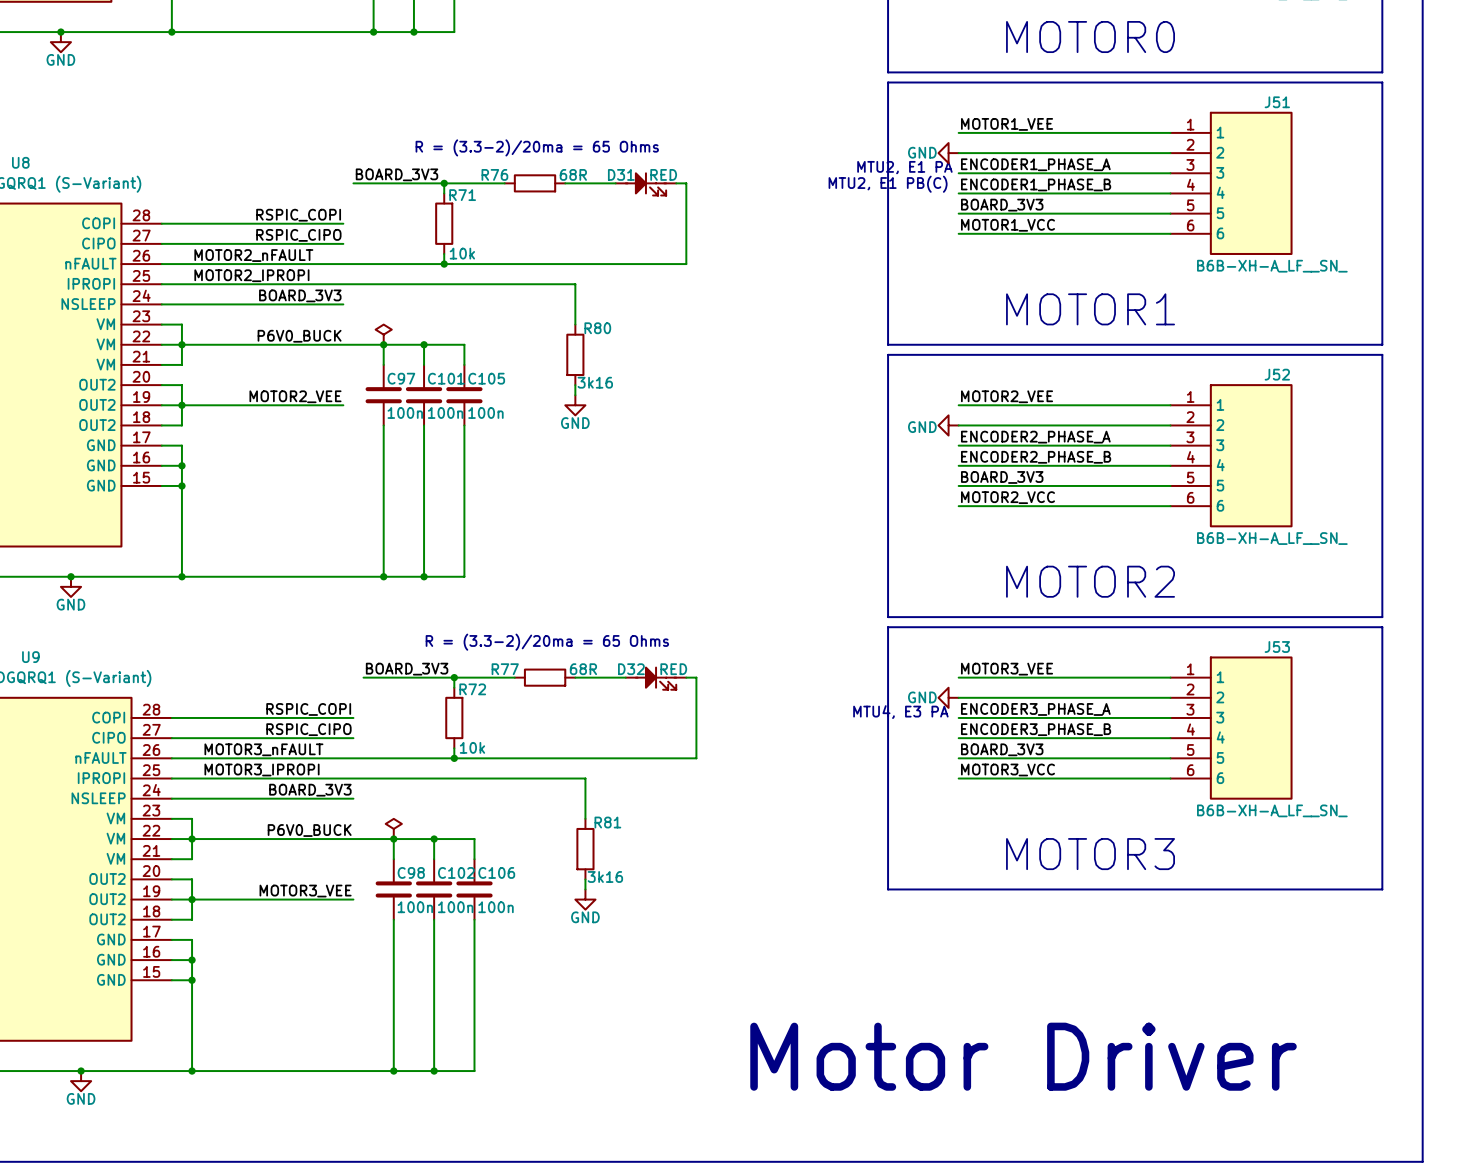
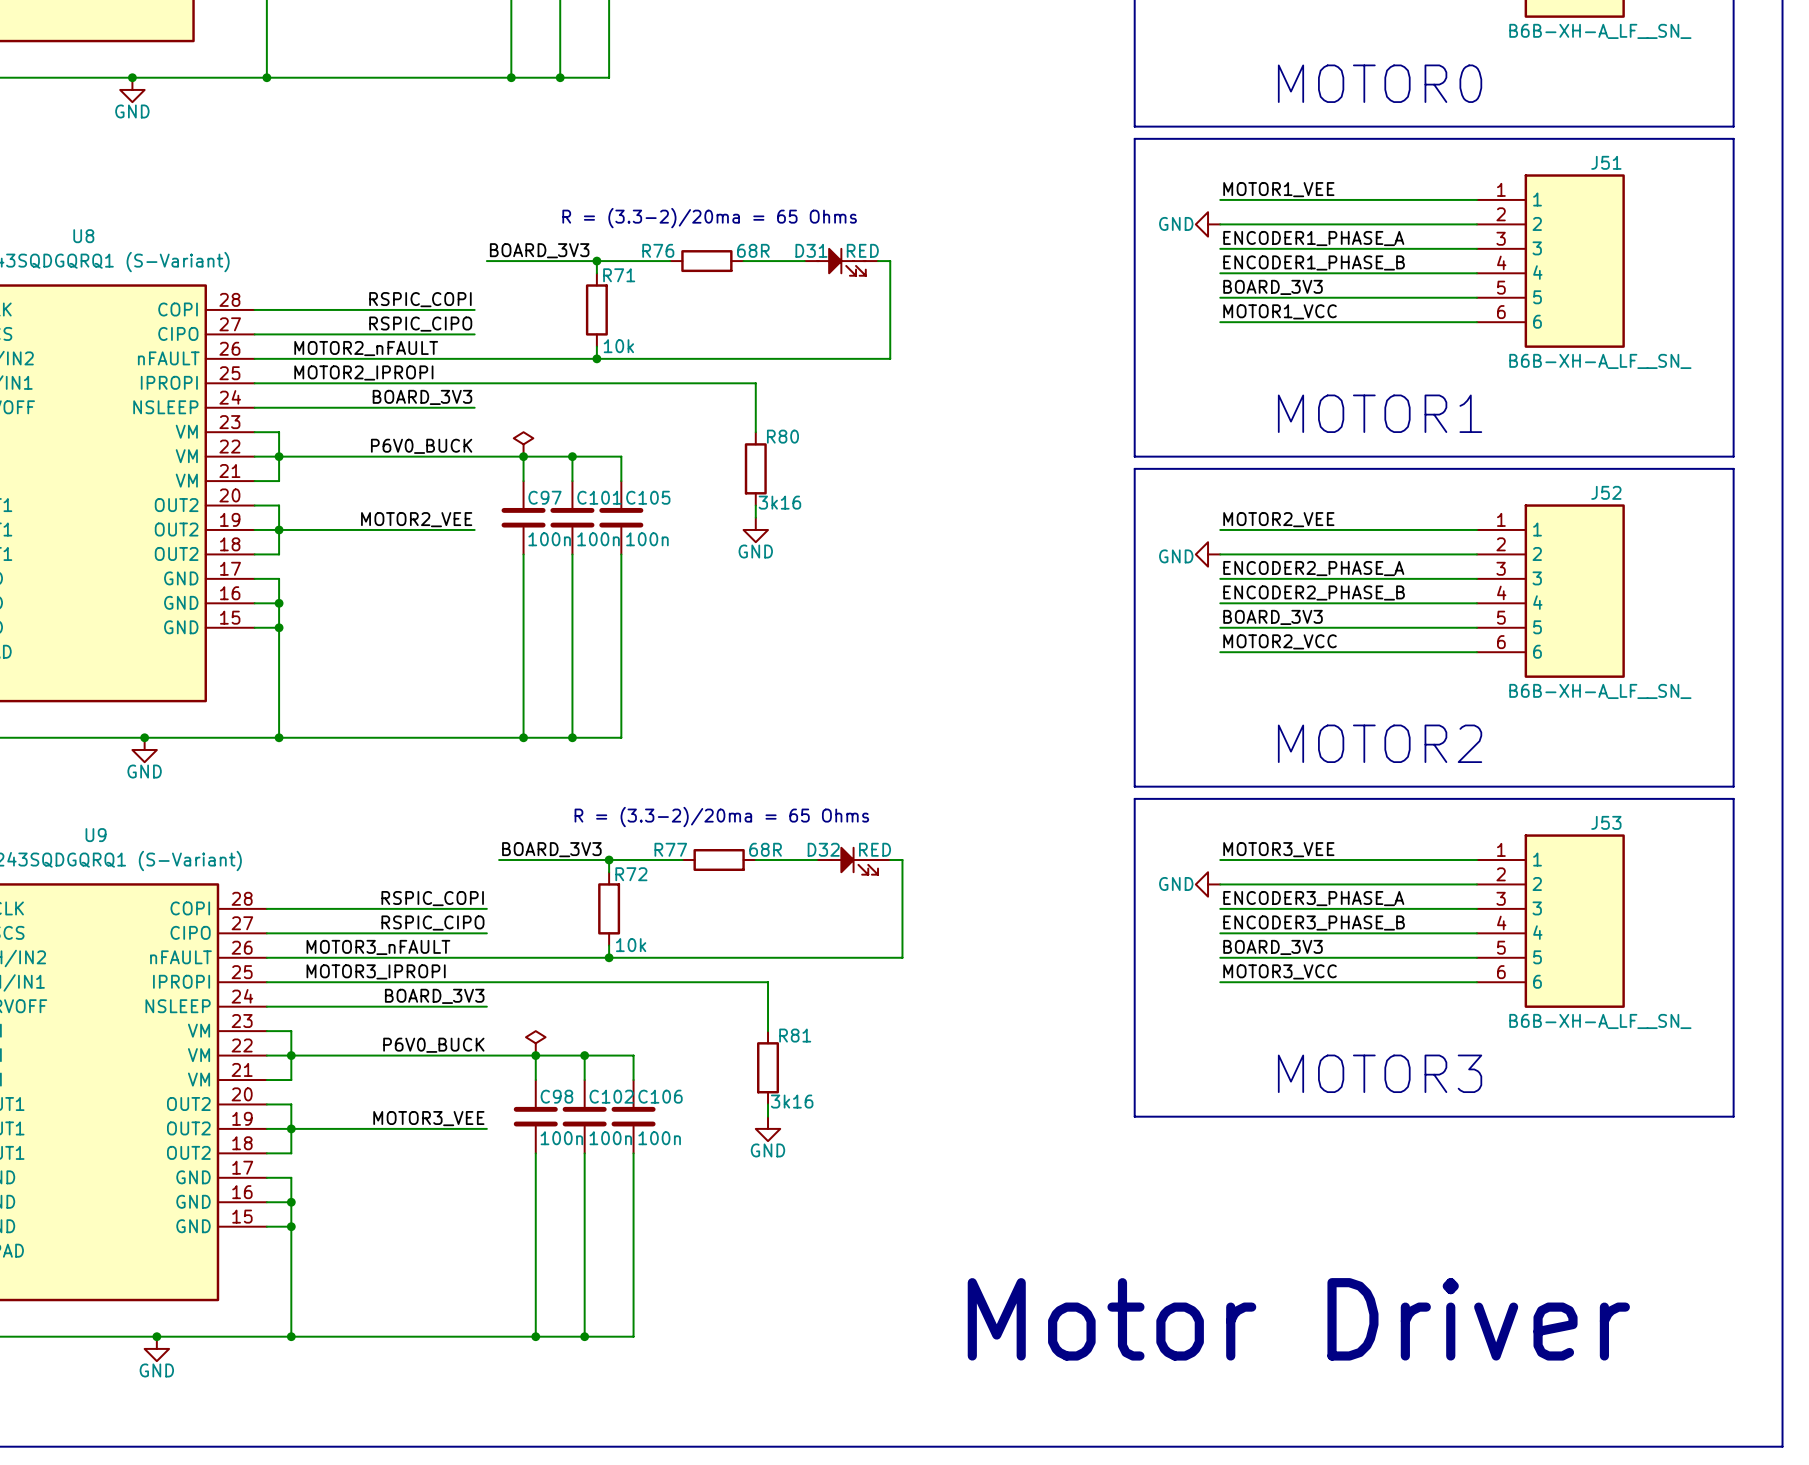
text: MTU2, E1 PA (904, 167) -> none
text: MTU2, E1 PB(C) (888, 184) -> none
text: MTU4, E3 PA (900, 712) -> none

